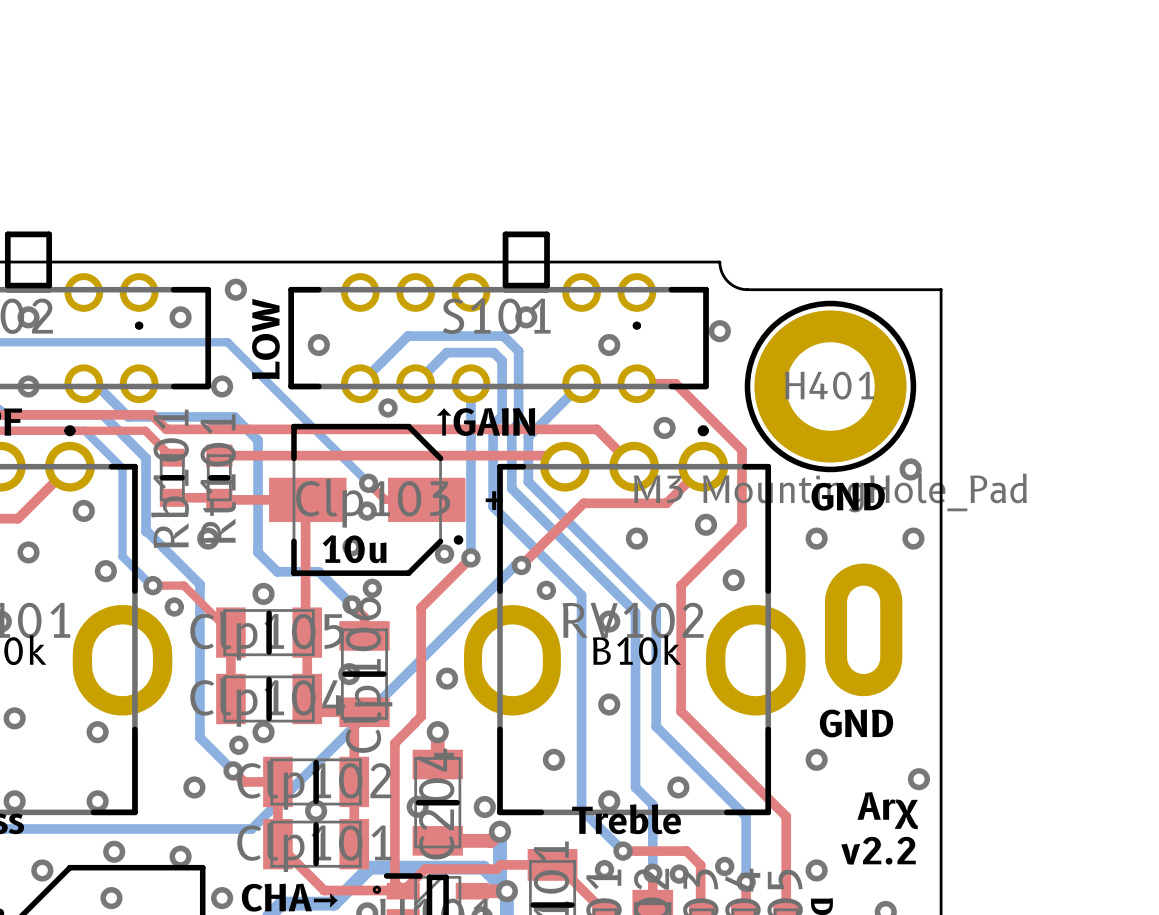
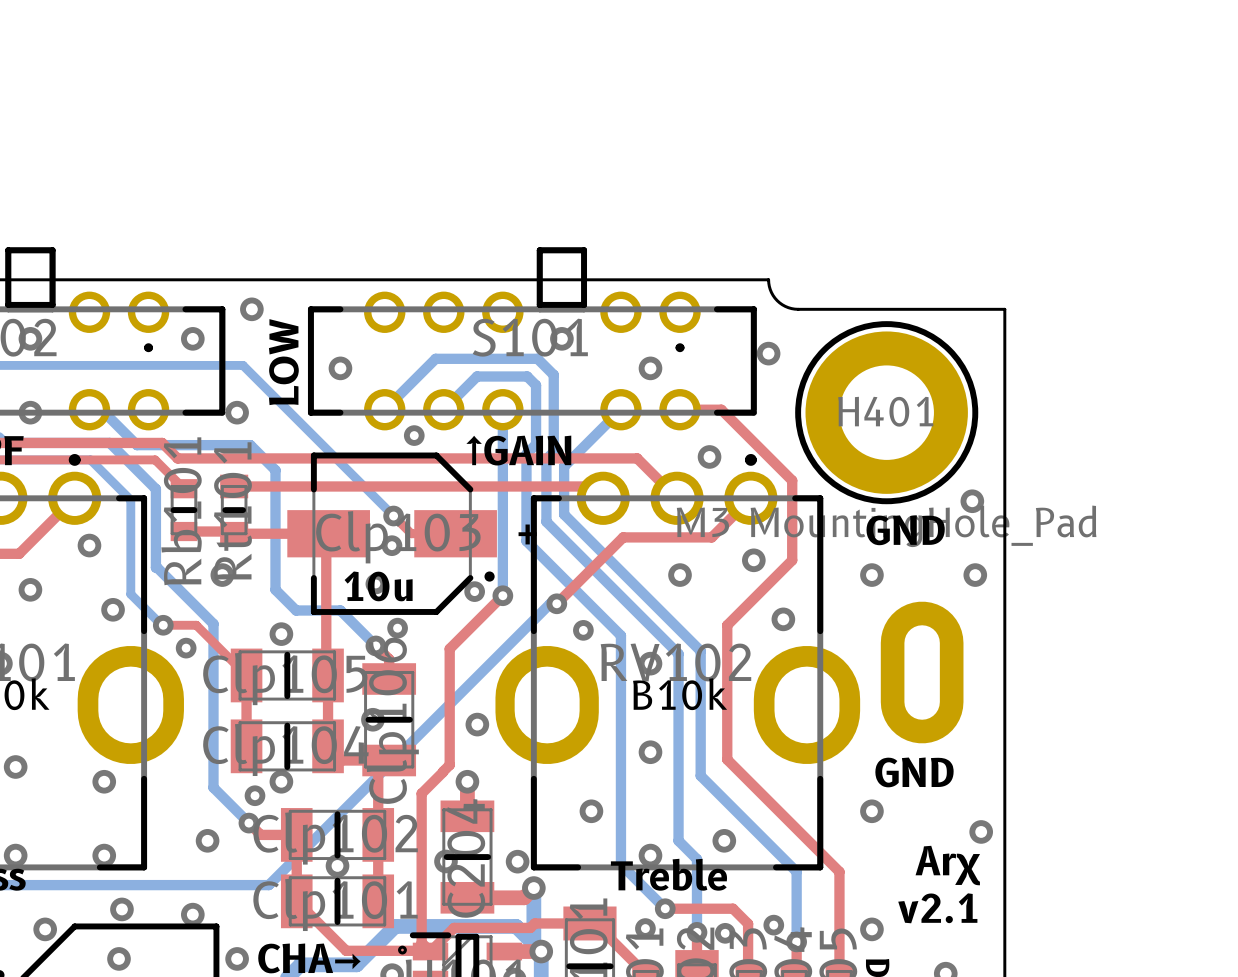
text: v2.2 (878, 850) -> v2.1 (937, 908)

